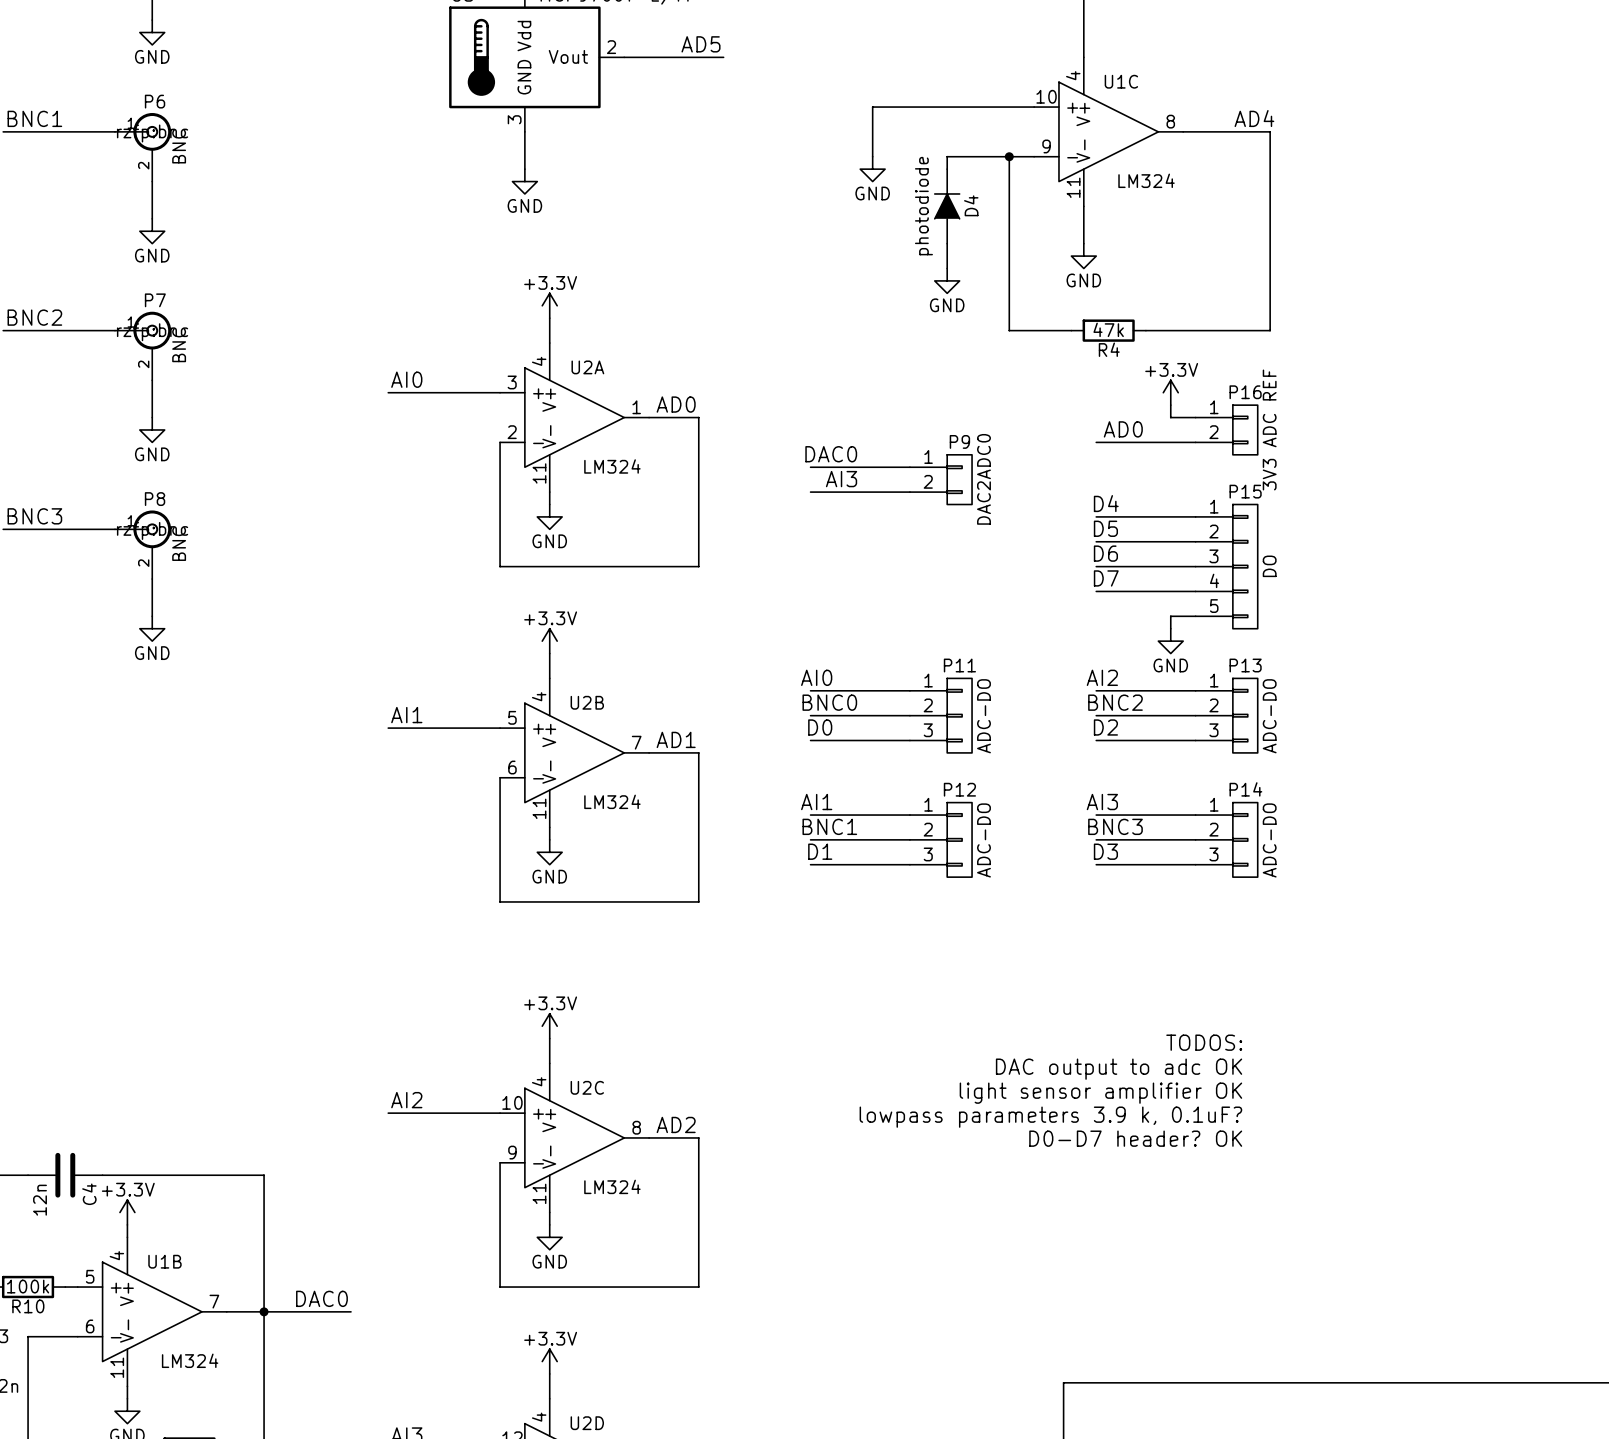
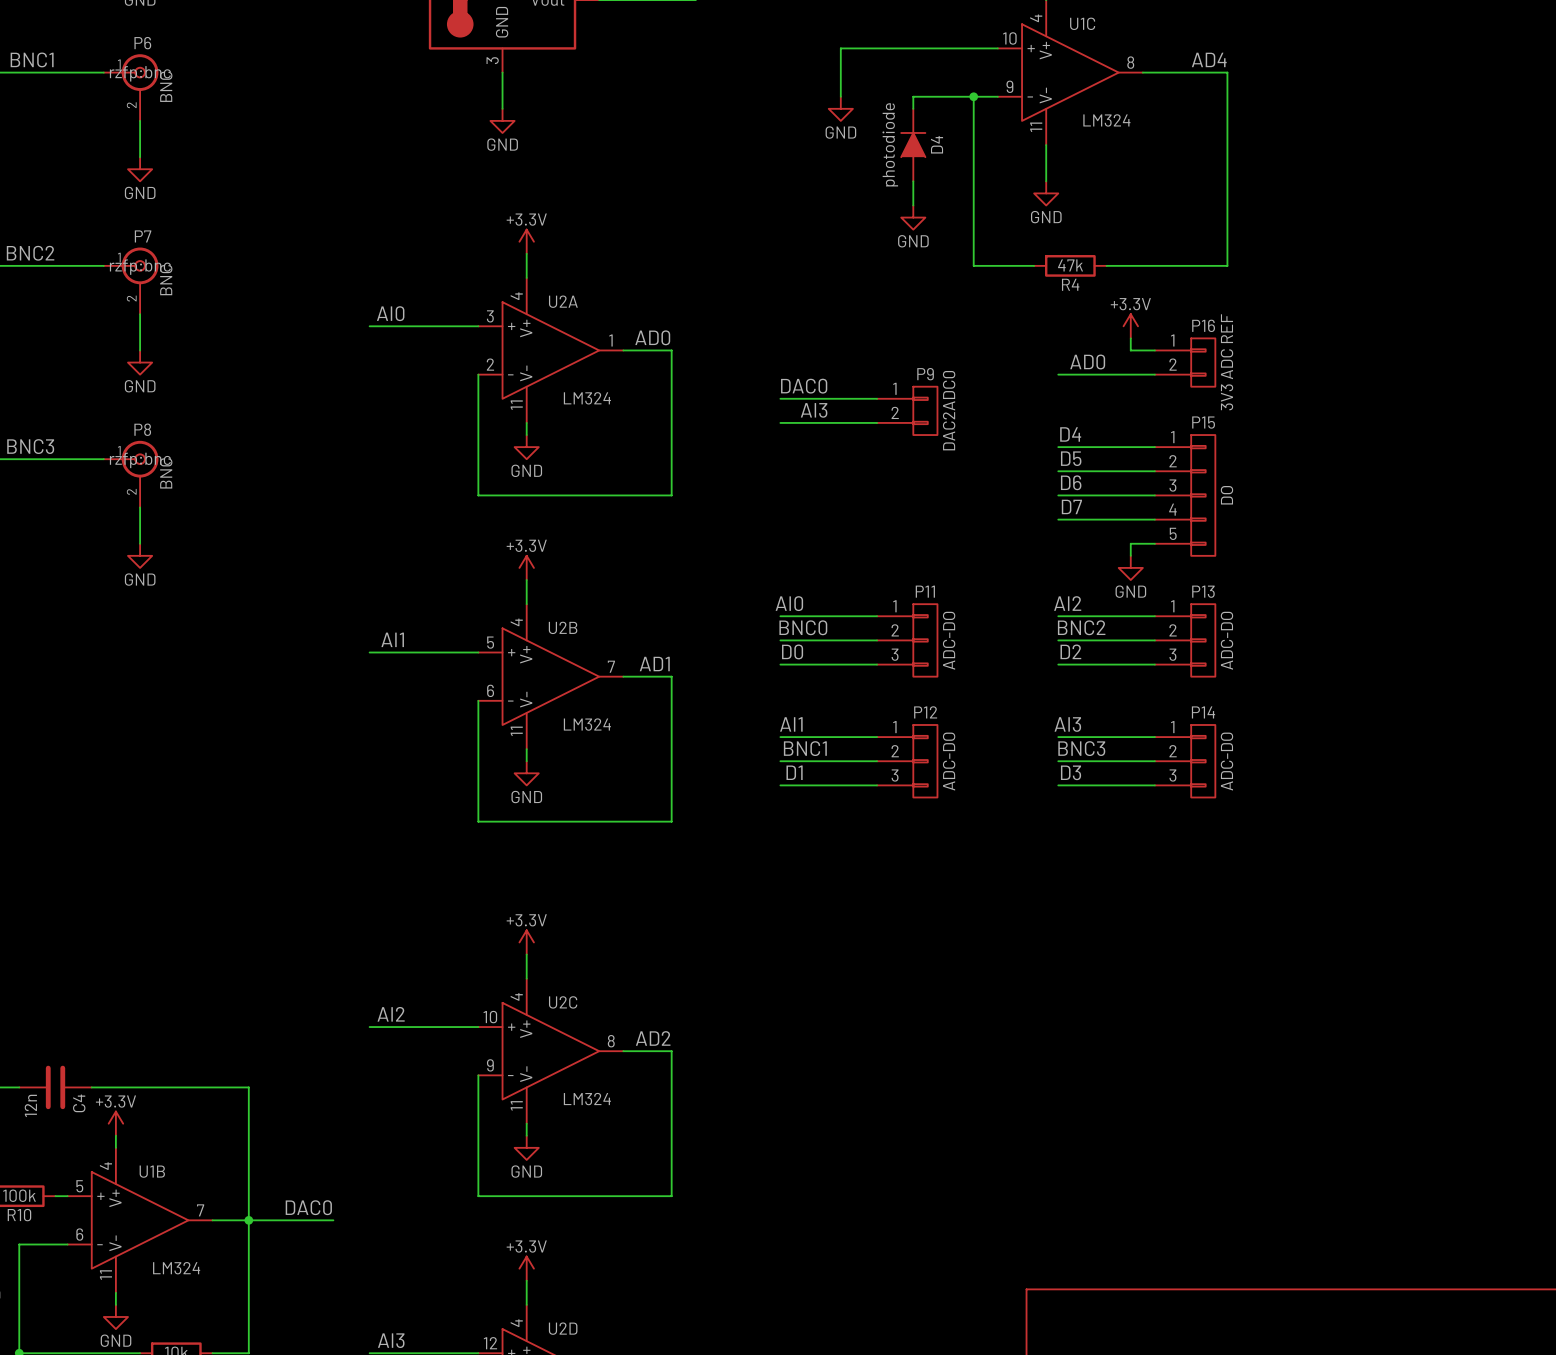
text: TODOS: (1204, 1042) -> none
text: DAC output to adc OK (1119, 1069) -> none
text: light sensor amplifier OK (1100, 1093) -> none
text: lowpass parameters 3.9 k, 0.1uF? (1050, 1117) -> none
text: D0-D7 header? OK (1135, 1138) -> none

